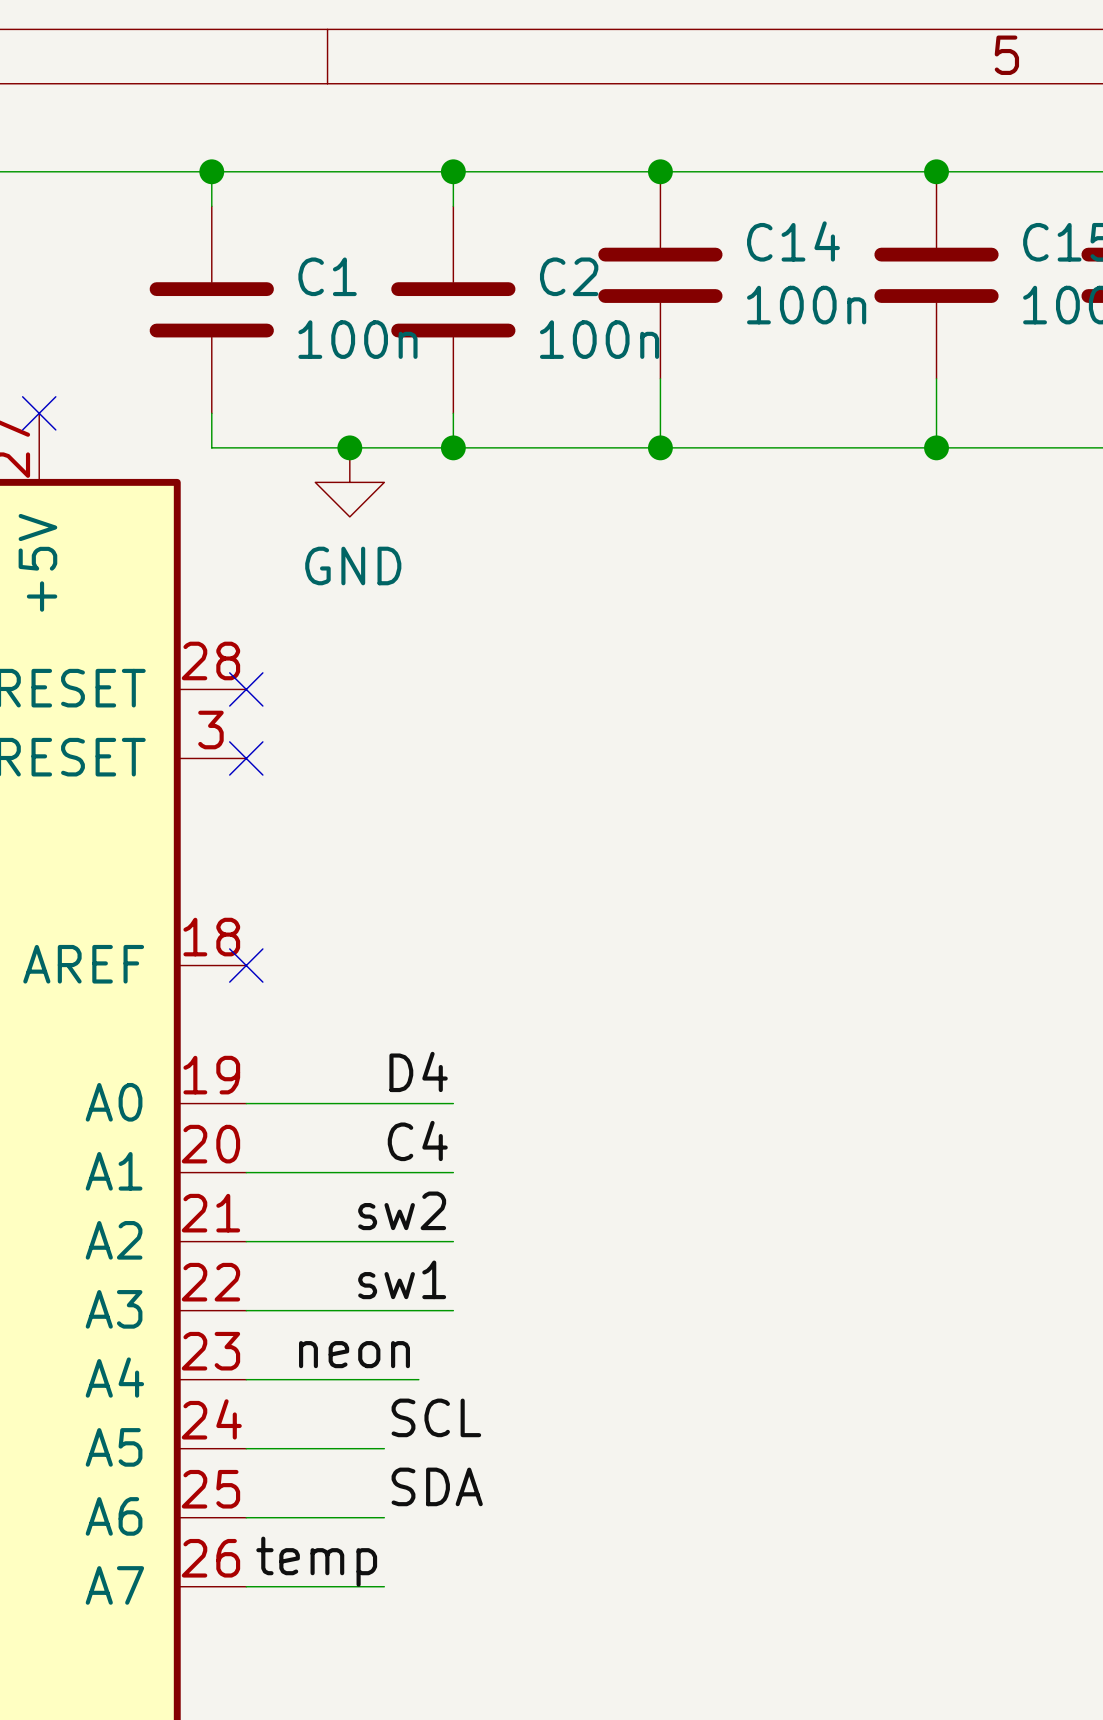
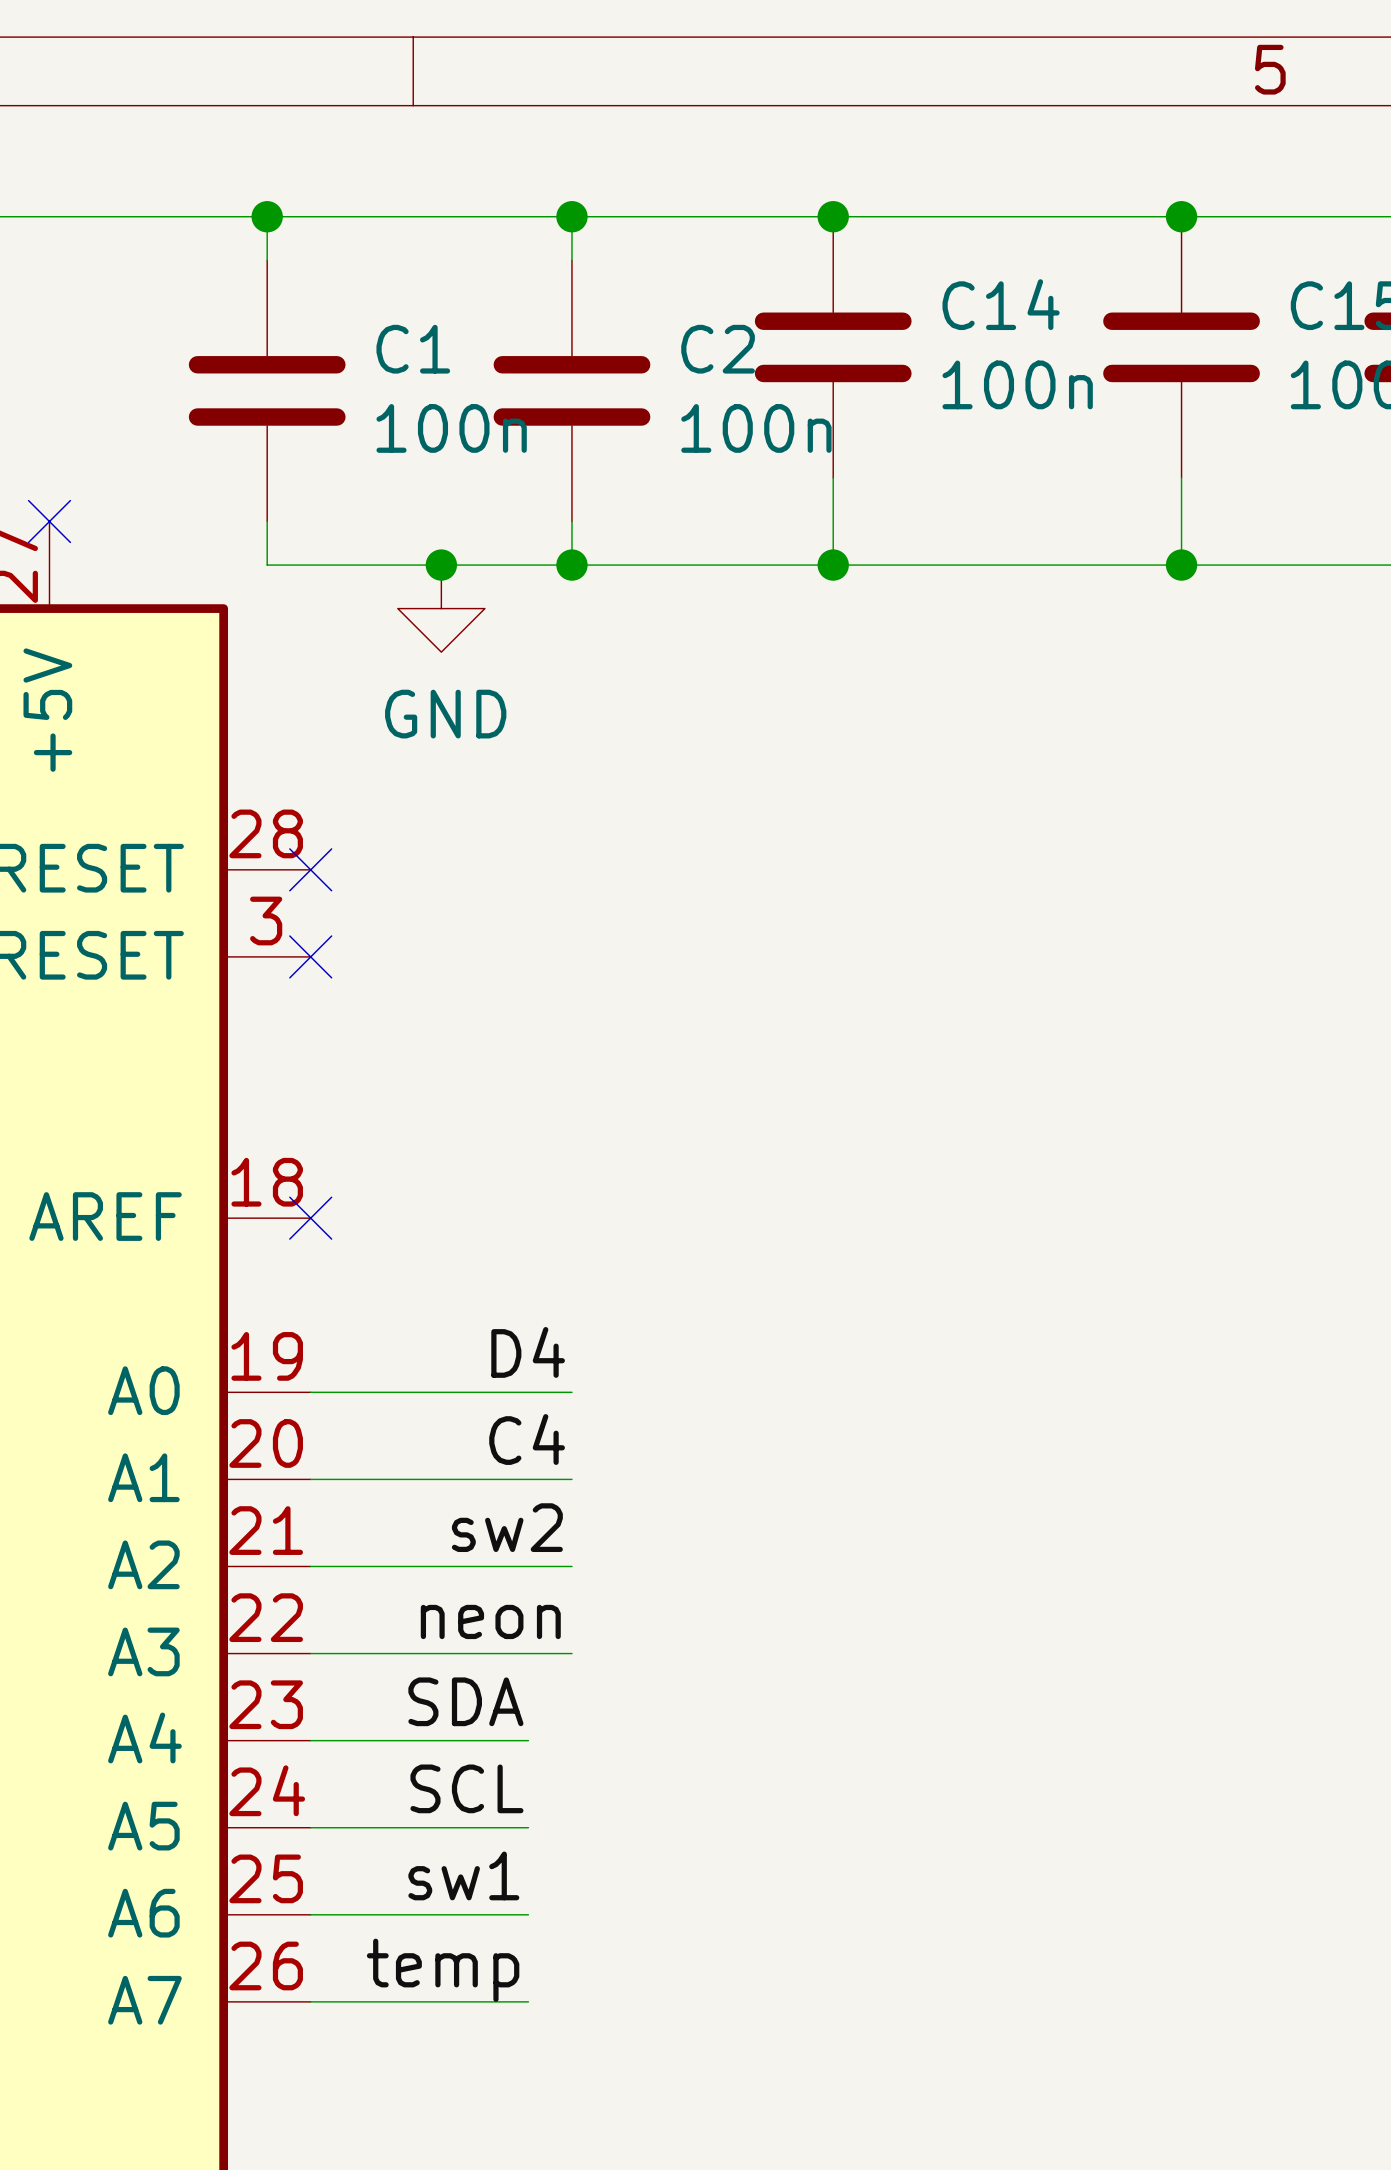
label: sw1 (402, 1279) -> neon (490, 1621)
label: neon (354, 1354) -> SDA (465, 1701)
label position: SCL (436, 1417) -> SCL (466, 1788)
wire: none -> (484, 1827) (528, 1827)
label: none -> sw1 (463, 1875)
label: SDA (437, 1486) -> none
wire: none -> (484, 1914) (528, 1914)
label position: temp (316, 1561) -> temp (443, 1970)
wire: none -> (484, 2001) (528, 2001)

